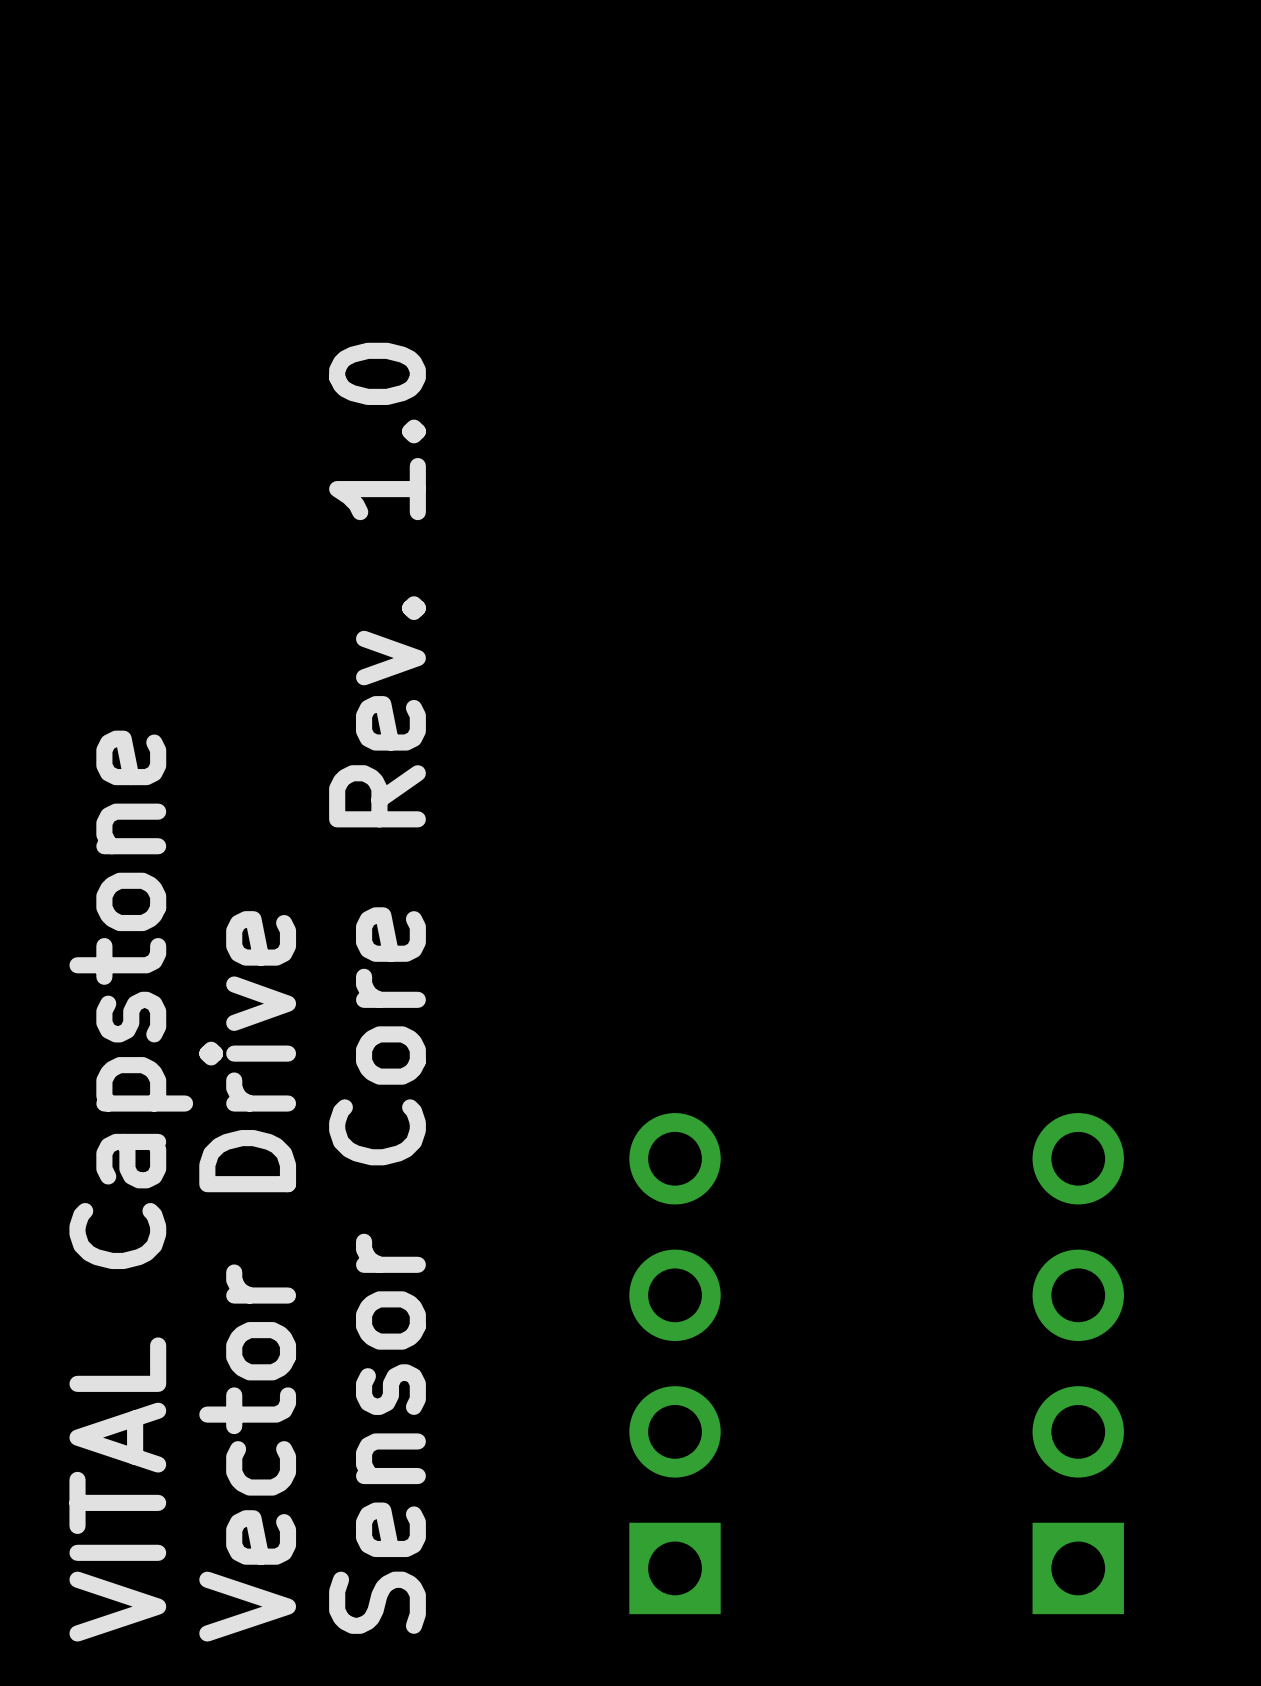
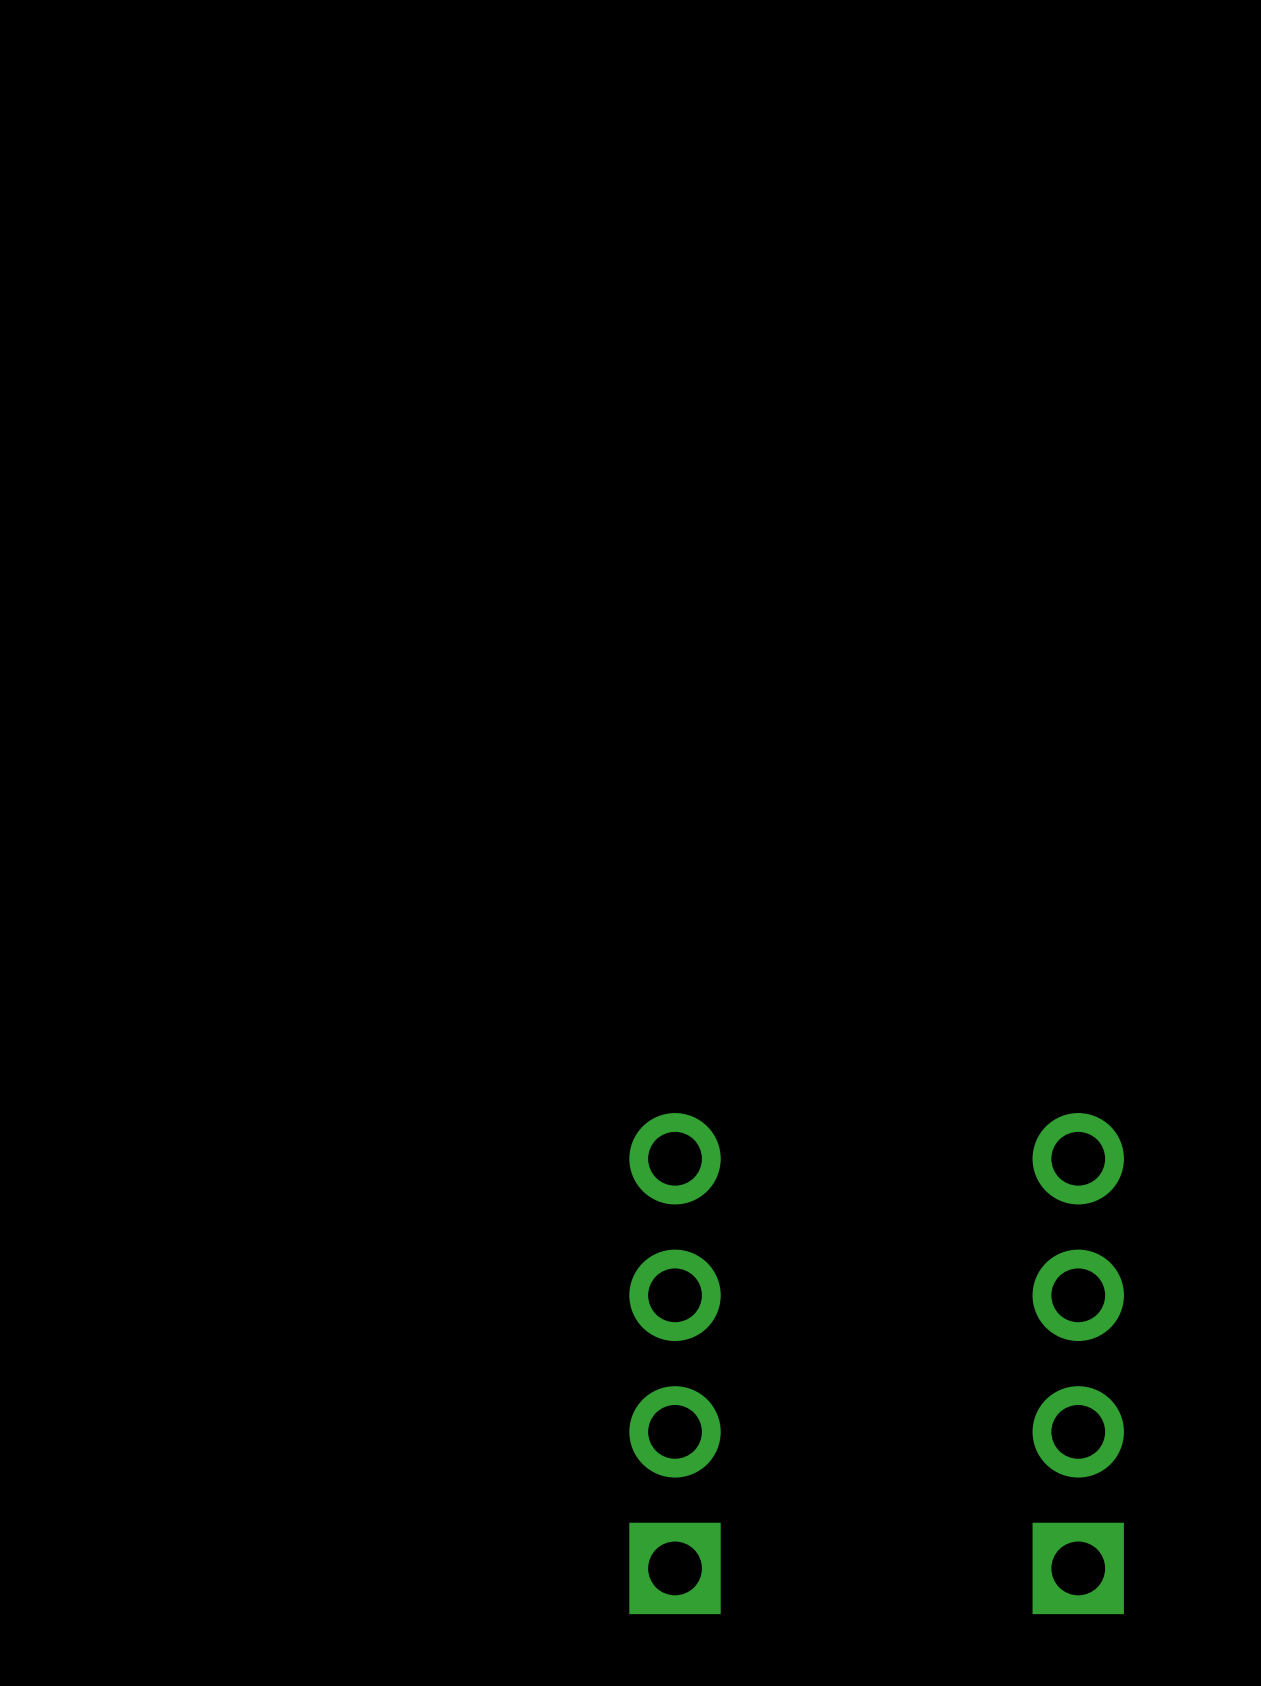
text: Sensor Core Rev. 1.0 (377, 988) -> none
text: VITAL Capstone (131, 1186) -> none
text: Vector Drive (247, 1276) -> none

